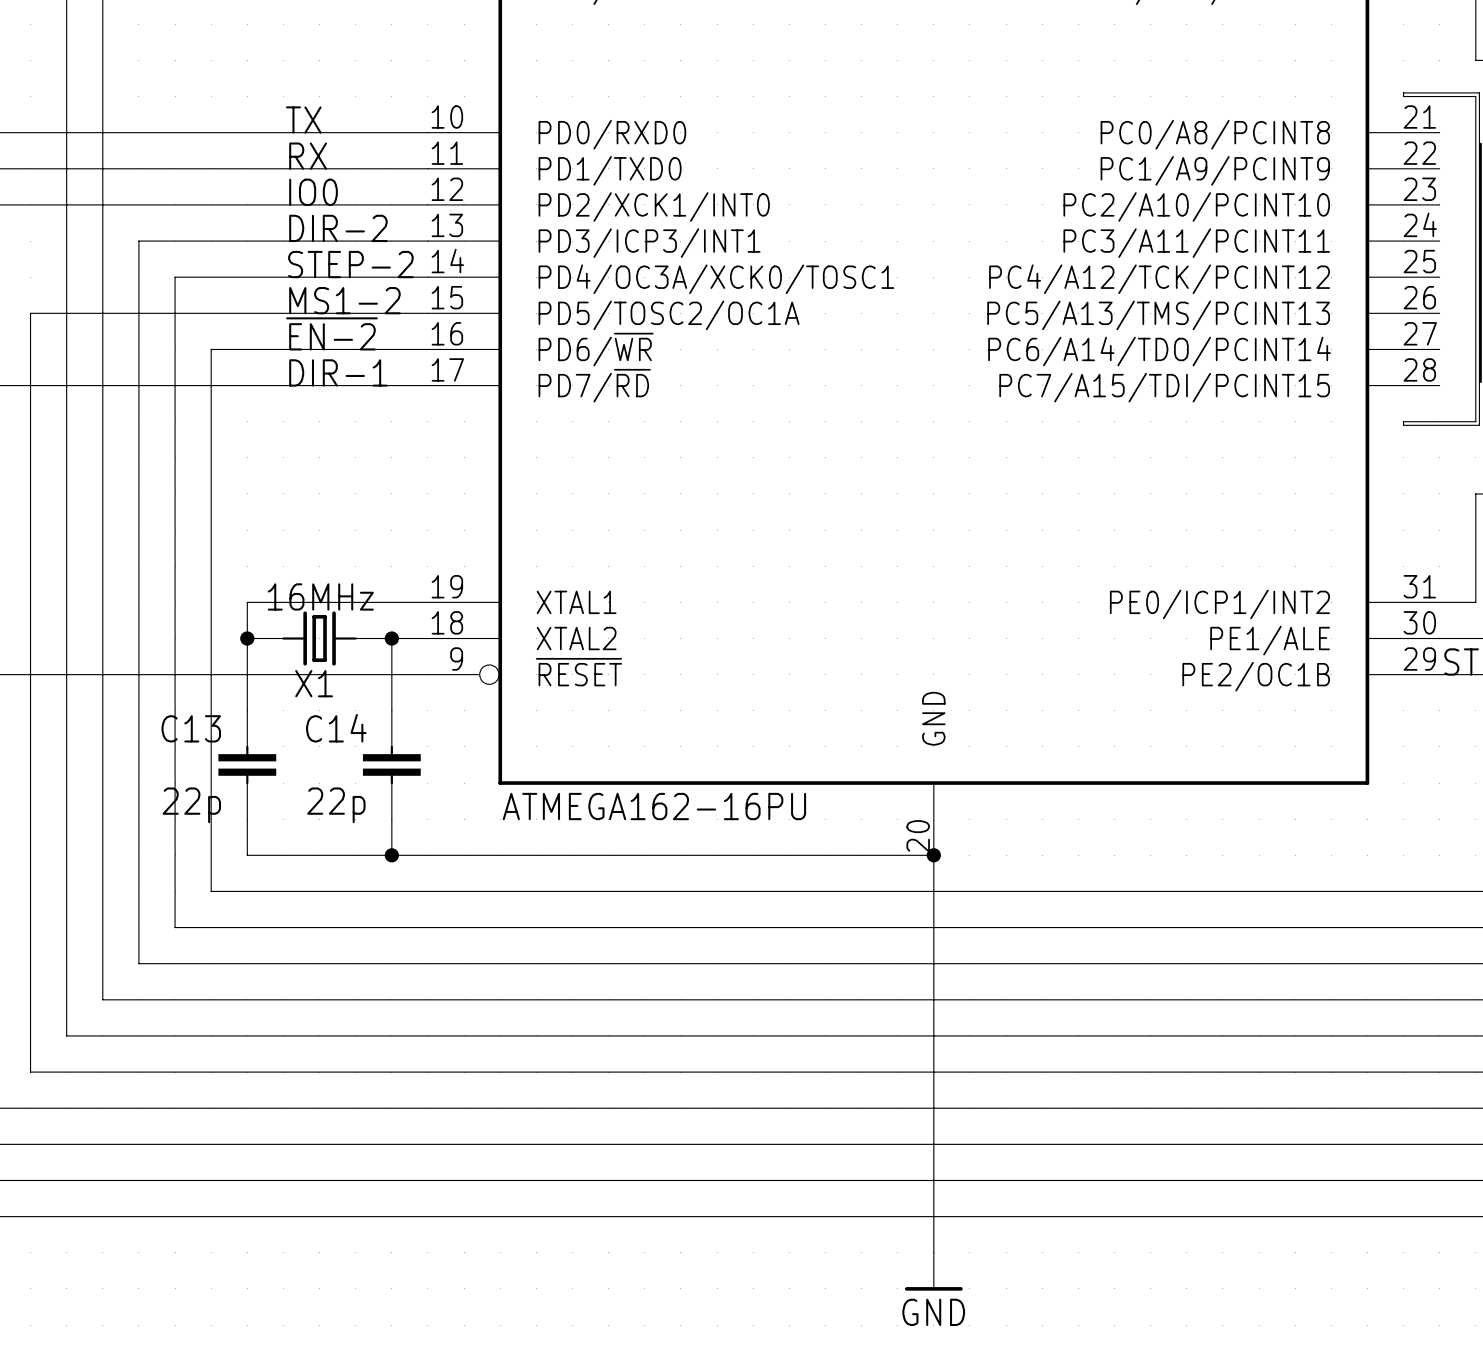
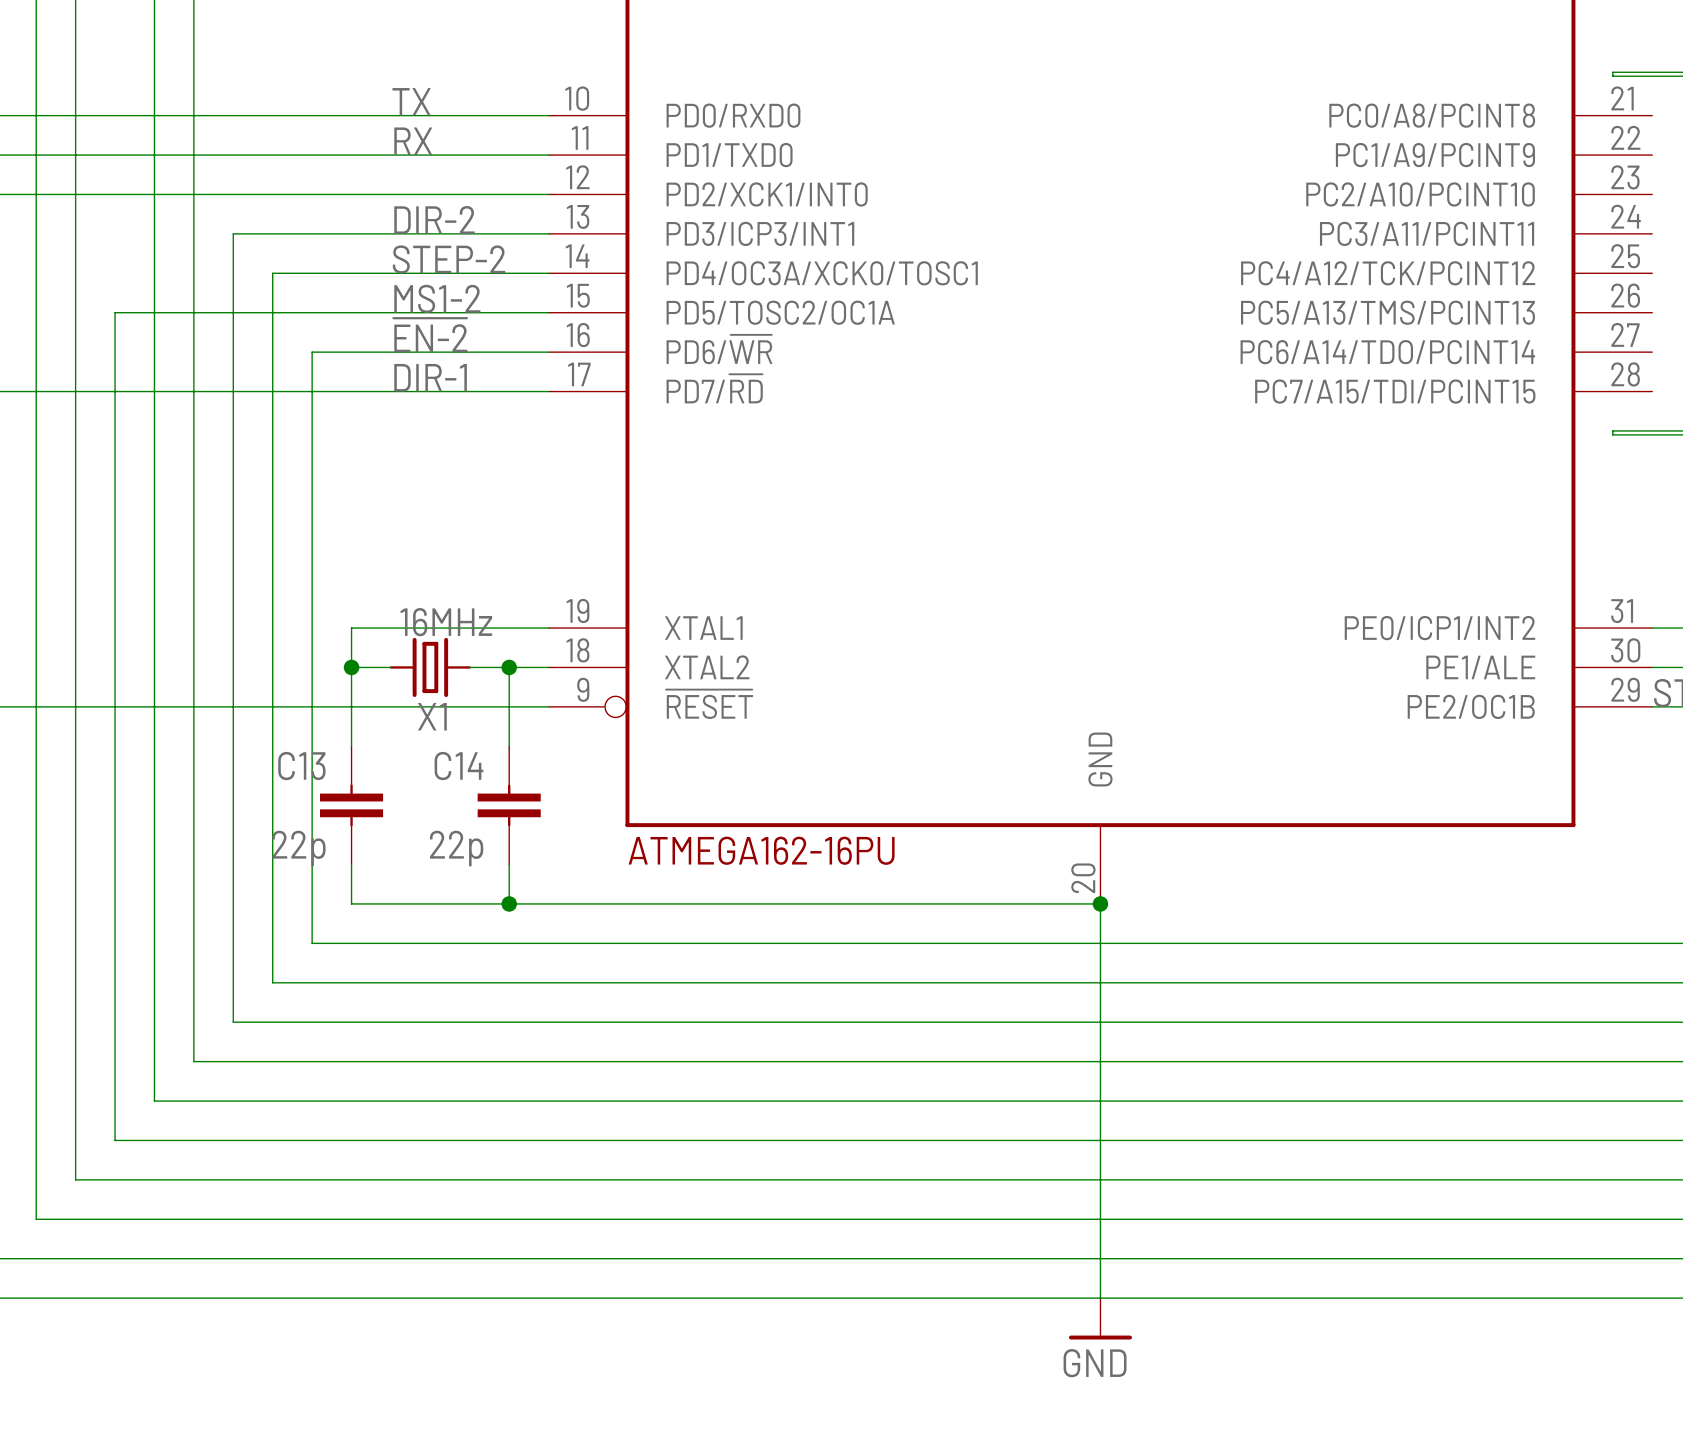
label: IO0 (313, 192) -> none
power symbol position: GND (933, 1271) -> GND (1100, 1318)

